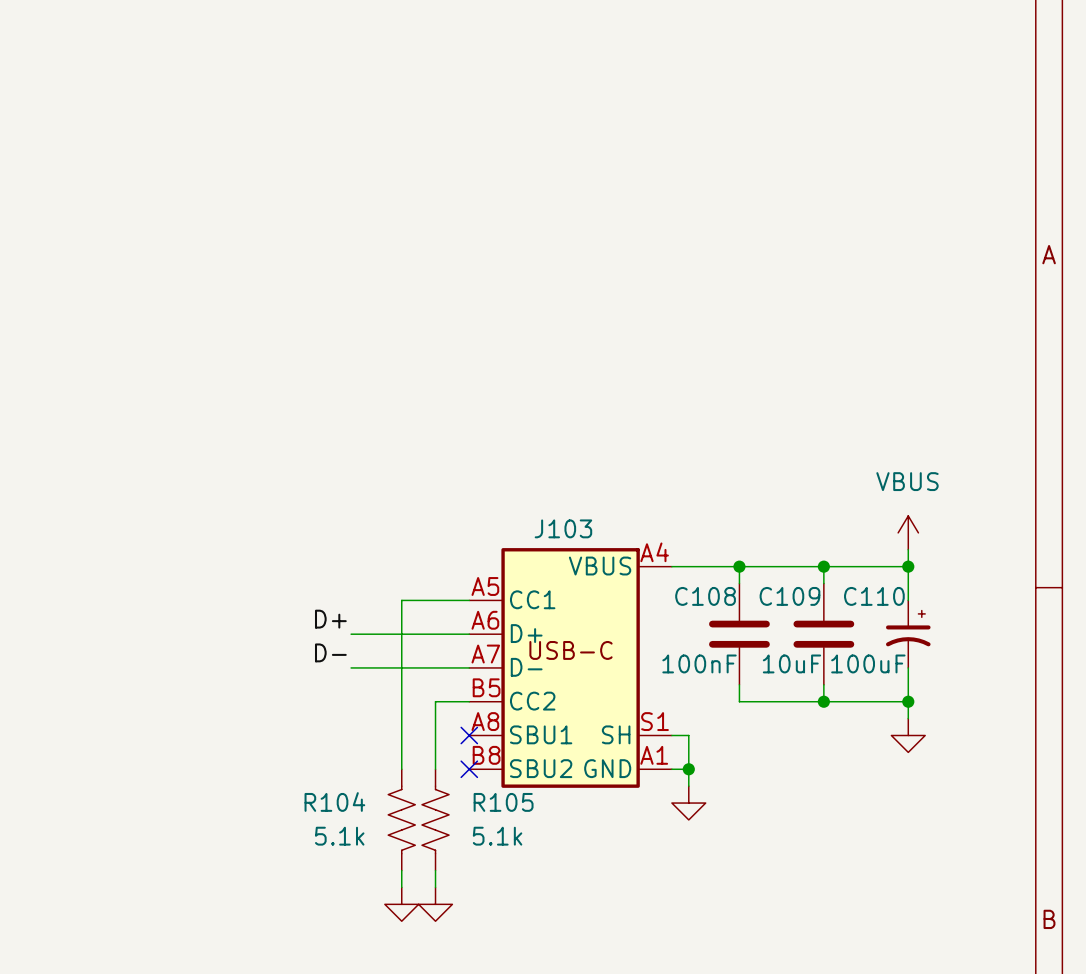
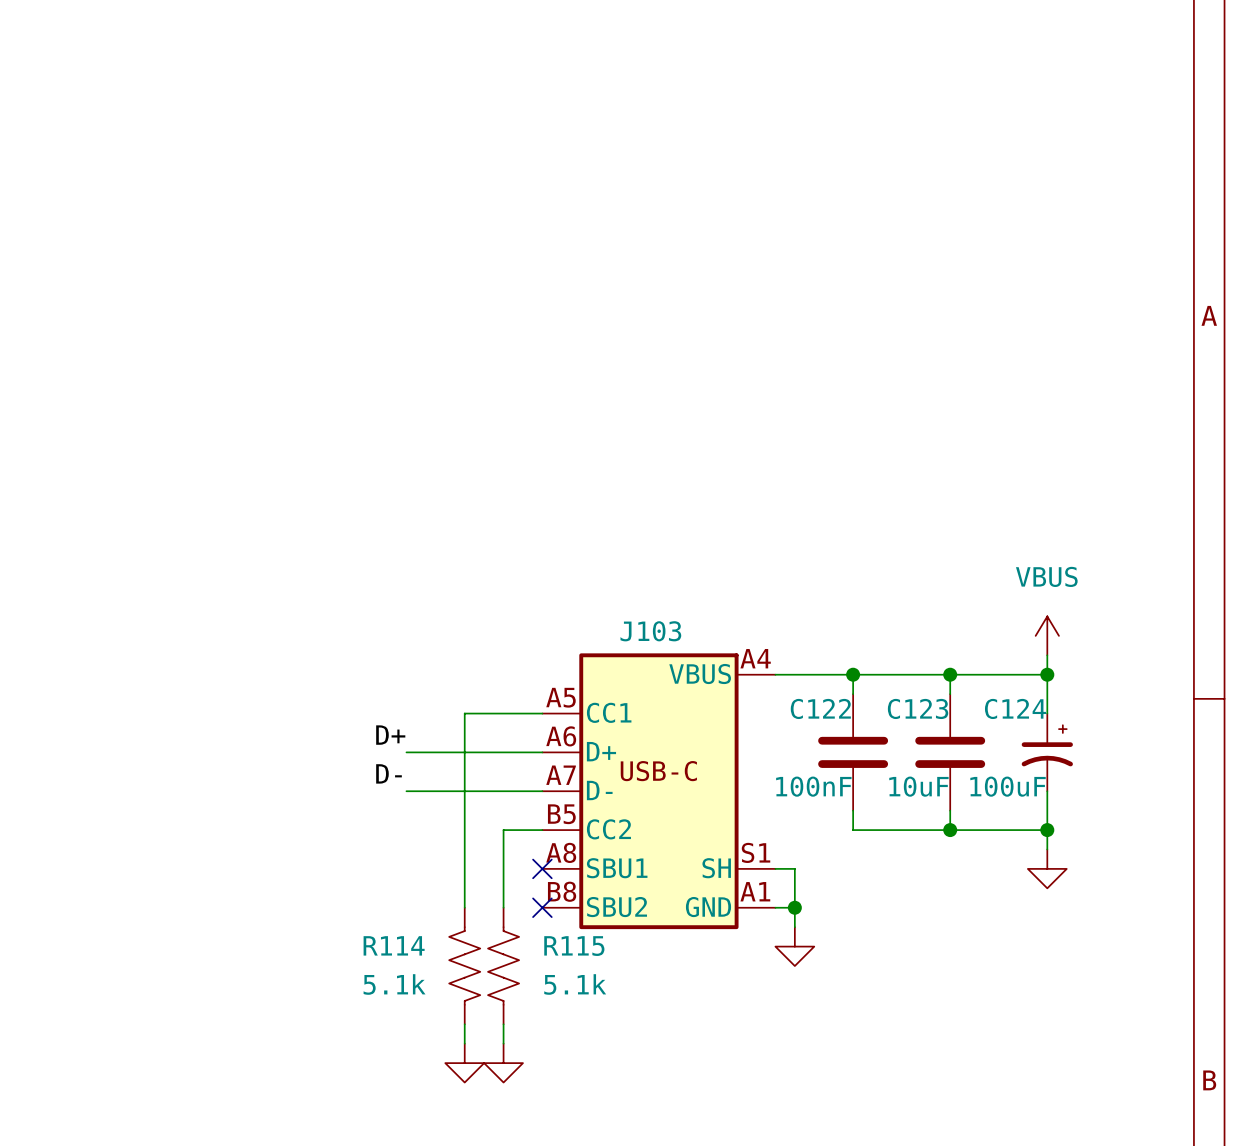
C108 name: C108 (705, 596) -> C122 (820, 708)
C109 name: C109 (789, 596) -> C123 (918, 708)
C110 name: C110 (874, 596) -> C124 (1015, 708)
R104 name: R104 (334, 802) -> R114 (394, 945)
R105 name: R105 (503, 802) -> R115 (574, 946)

